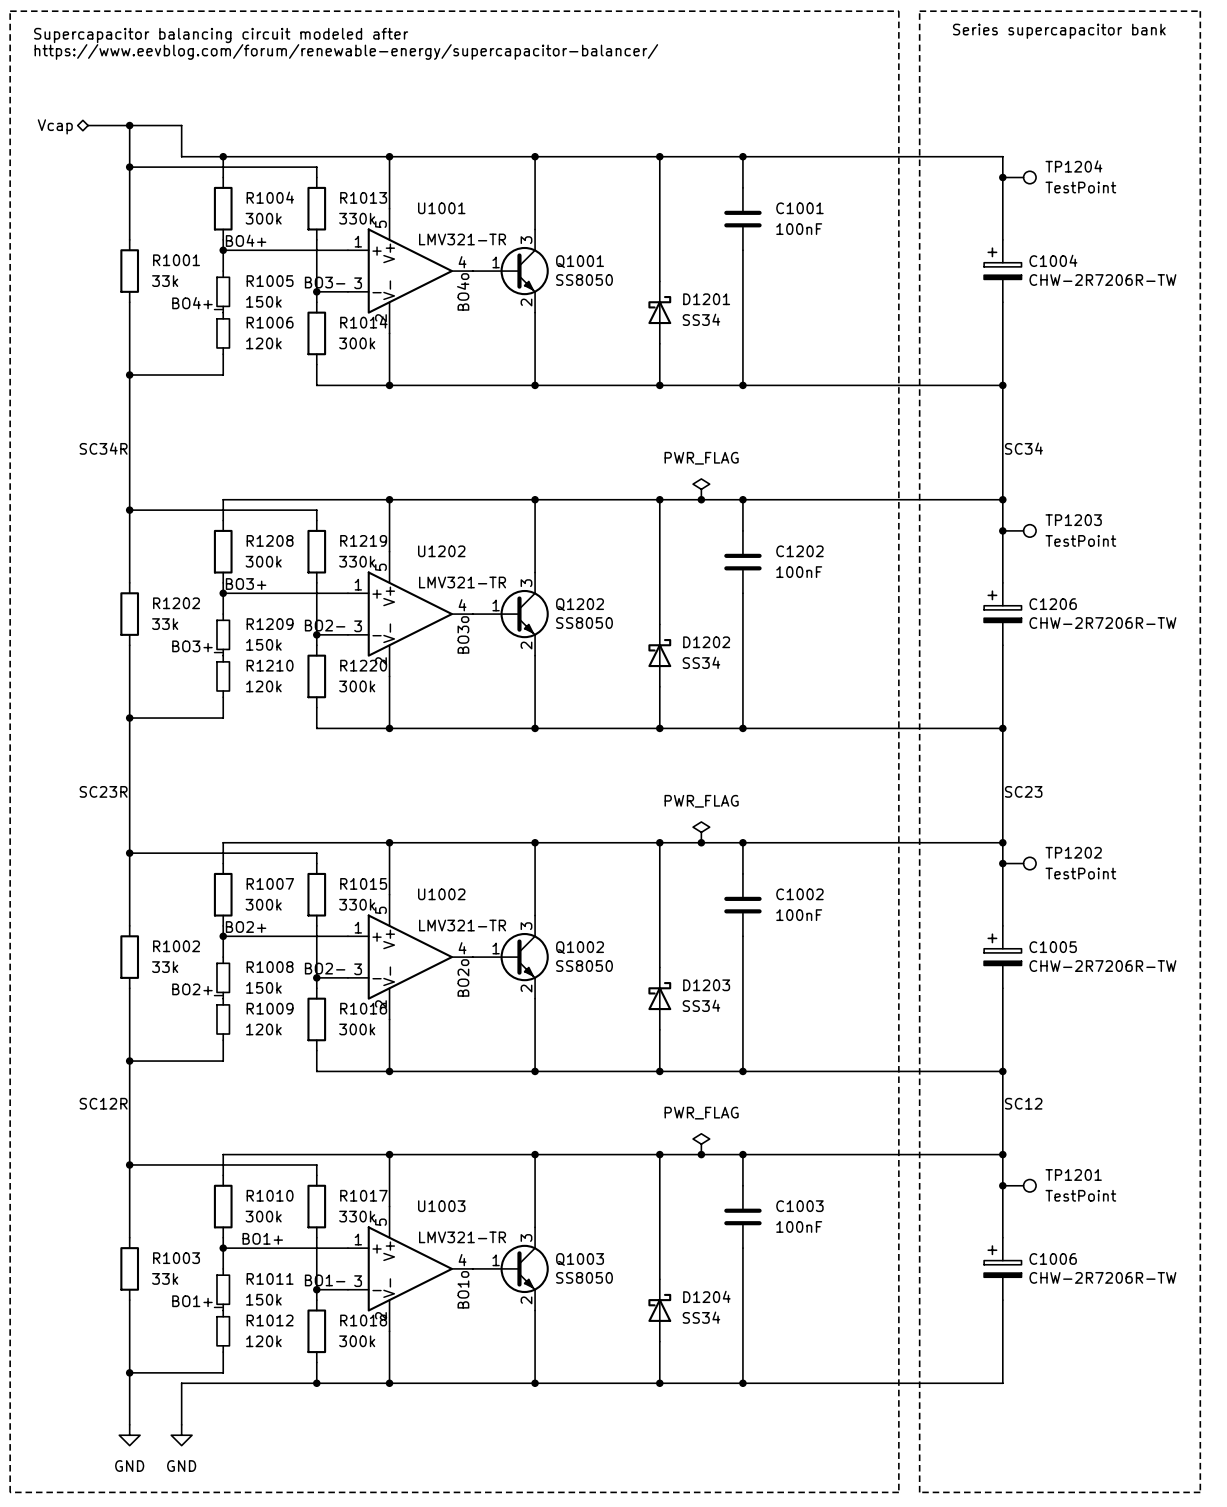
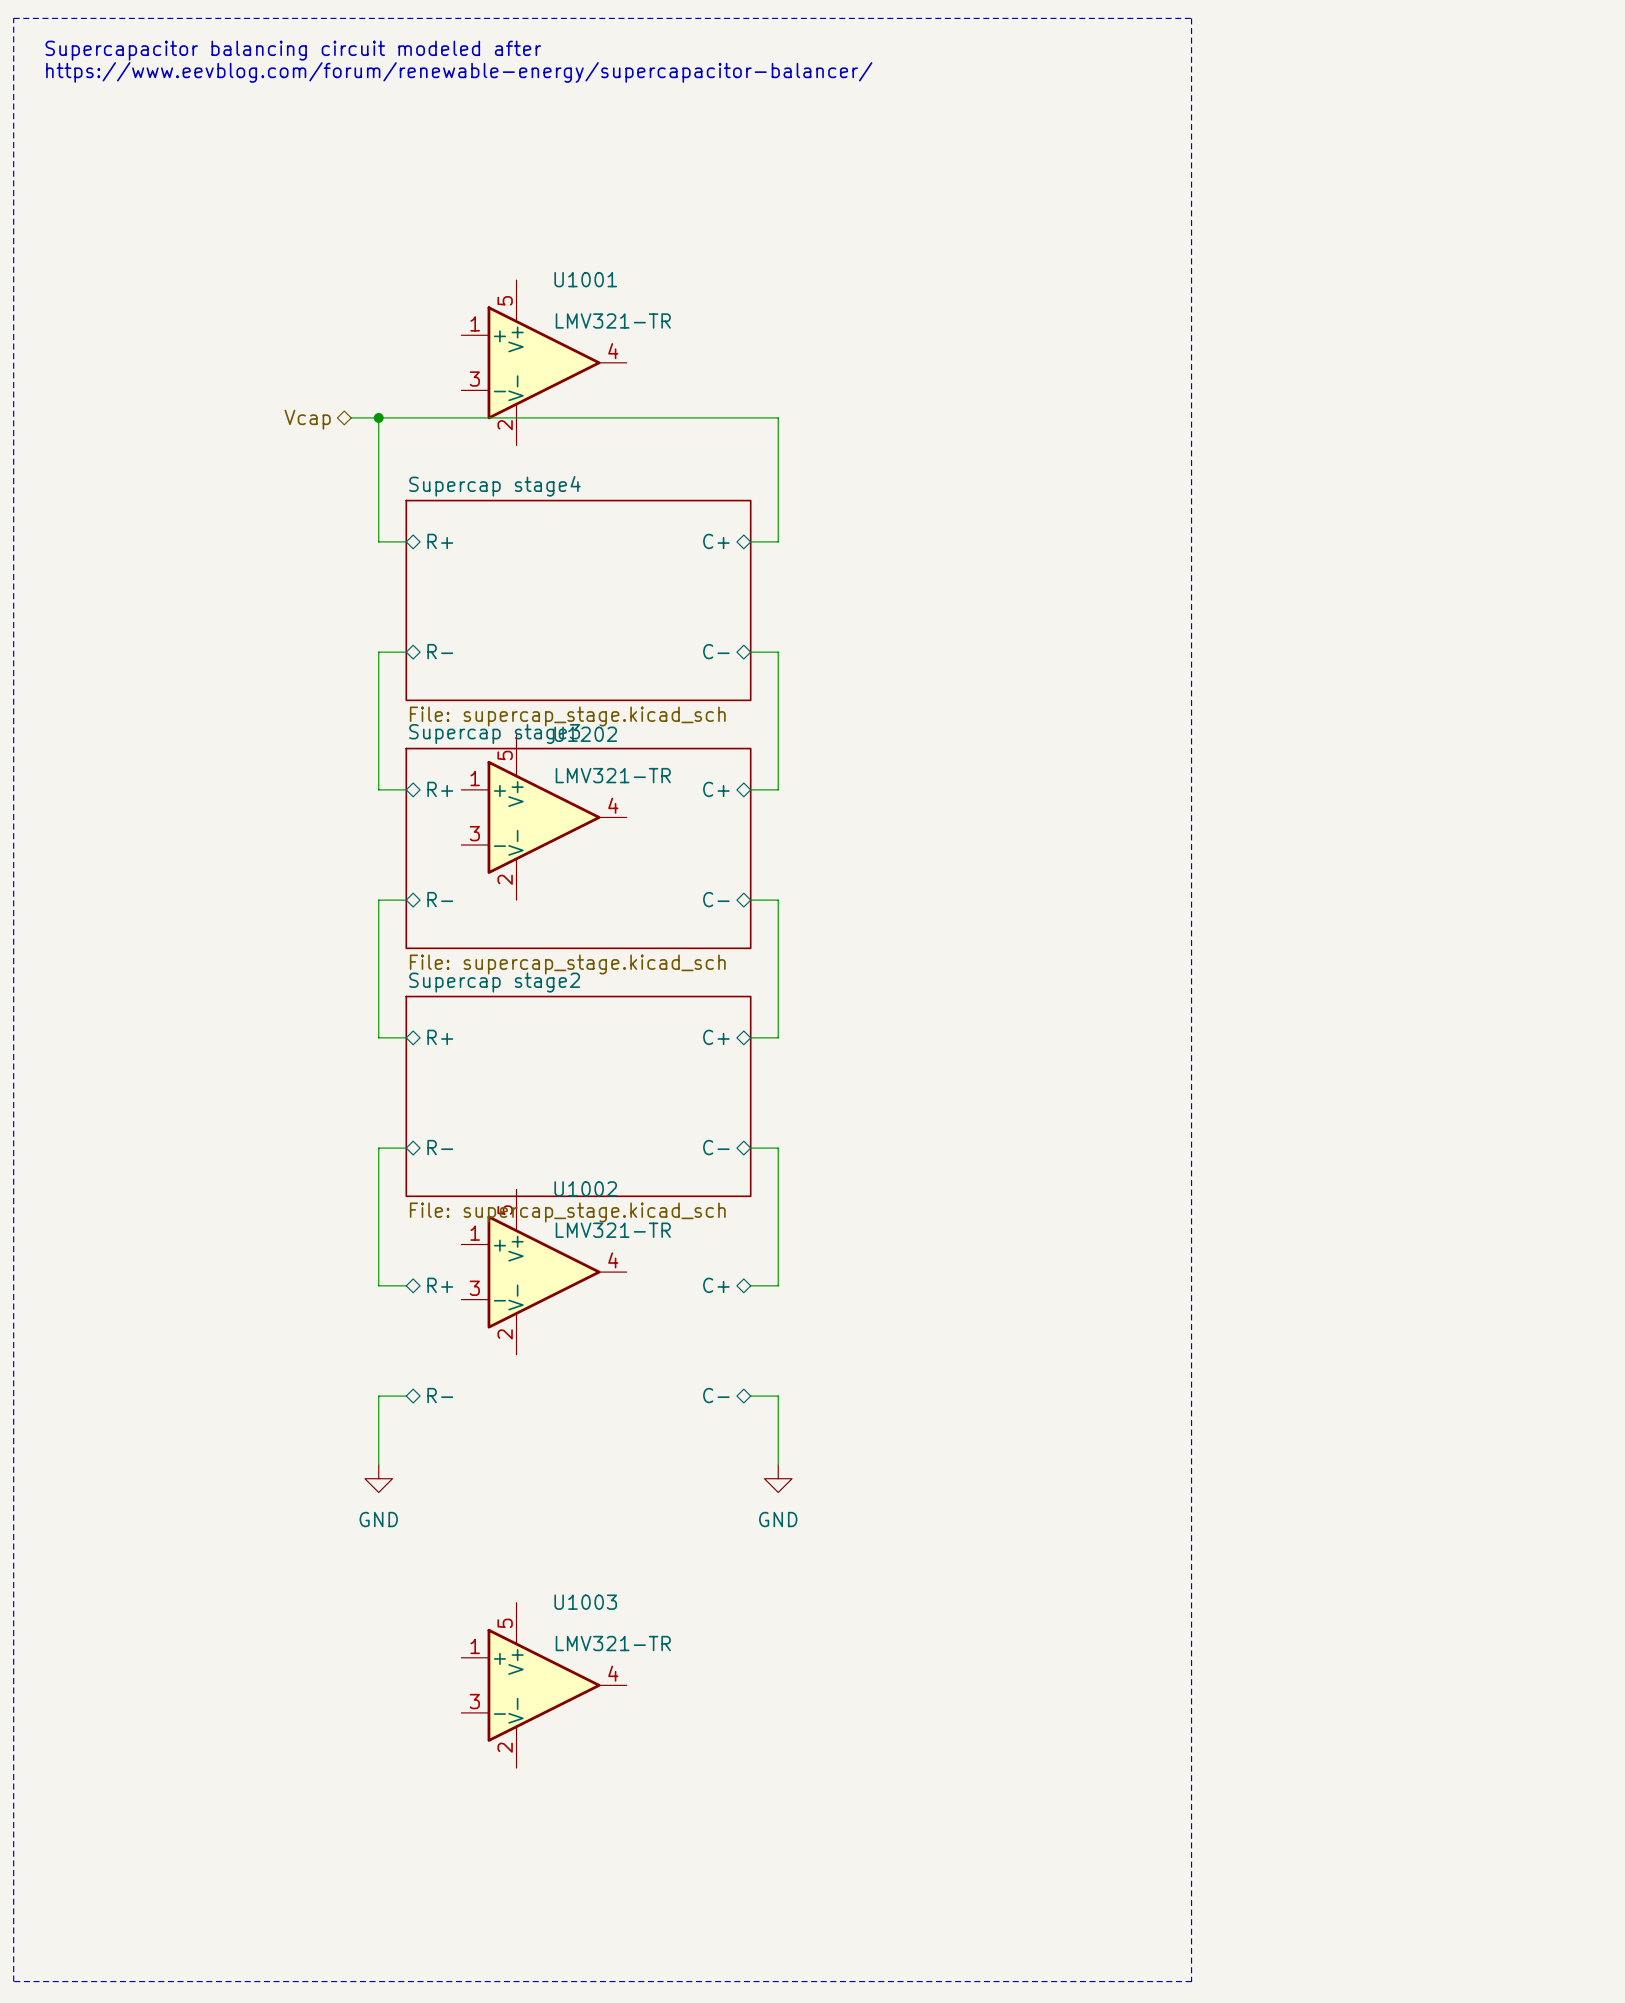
line: (919, 11) (1200, 11) (1200, 1492) (919, 1492) (919, 11) -> none
text: Series supercapacitor bank (1059, 31) -> none
wire: (88, 125) (181, 125) (181, 156) (1002, 156) (1002, 239) -> none
wire: (129, 125) (129, 239) -> none
junction: (129, 125) -> none
hierarchical label: Vcap (55, 126) -> none
wire: (223, 156) (223, 177) -> none
junction: (223, 156) -> none
wire: (389, 156) (389, 208) -> none
junction: (389, 156) -> none
wire: (535, 156) (535, 229) -> none
junction: (535, 156) -> none
wire: (659, 156) (659, 281) -> none
junction: (659, 156) -> none
wire: (742, 156) (742, 187) -> none
junction: (742, 156) -> none
wire: (129, 167) (316, 167) (316, 177) -> none
junction: (129, 167) -> none
junction: (1002, 177) -> none
TP1204: TestPoint (1019, 177) -> none
R1004: 300k (223, 208) -> none
R1013: 330k (316, 208) -> none
C1001: 100nF (742, 219) -> none
wire: (223, 239) (223, 271) -> none
wire: (316, 239) (316, 302) -> none
label: BO4+ (246, 240) -> none
wire: (223, 250) (347, 250) -> none
junction: (223, 250) -> none
wire: (742, 250) (742, 385) -> none
R1001: 33k (129, 271) -> none
Q1001: SS8050 (510, 271) -> none
C1004: CHW-2R7206R-TW (1002, 271) -> none
label: BO3- (325, 282) -> none
R1005: 150k (223, 291) -> none
wire: (316, 291) (347, 291) -> none
junction position: (316, 291) -> (378, 417)
label: BO4o (463, 291) -> none
wire: (129, 302) (129, 582) -> none
wire: (1002, 302) (1002, 582) -> none
label: BO4+_ (197, 303) -> none
wire: none -> (351, 417) (778, 417) (778, 541) (750, 541)
wire: none -> (378, 417) (378, 541) (406, 541)
wire: (535, 312) (535, 385) -> none
D1201: SS34 (659, 312) -> none
hierarchical label: none -> Vcap (307, 419)
R1006: 120k (223, 333) -> none
R1014: 300k (316, 333) -> none
wire: (389, 333) (389, 385) -> none
wire: (659, 343) (659, 385) -> none
wire: (223, 354) (223, 375) (129, 375) -> none
wire: (316, 364) (316, 385) (1002, 385) -> none
junction: (129, 375) -> none
junction: (389, 385) -> none
junction: (535, 385) -> none
junction: (659, 385) -> none
junction: (742, 385) -> none
junction: (1002, 385) -> none
sheet pin: none -> R+ (440, 541)
sheet pin: none -> C+ (716, 541)
label: SC34R (103, 448) -> none
label: SC34 (1023, 448) -> none
sheet Supercap stage4: none -> File: supercap_stage.kicad_sch (578, 600)
sheet pin: none -> R- (440, 651)
sheet pin: none -> C- (716, 651)
wire: none -> (750, 652) (778, 652) (778, 789) (750, 789)
power symbol: PWR_FLAG (701, 489) -> none
wire: (389, 499) (389, 551) -> none
junction: (389, 499) -> none
wire: (535, 499) (535, 572) -> none
junction: (535, 499) -> none
wire: (659, 499) (659, 624) -> none
junction: (659, 499) -> none
junction: (701, 499) -> none
wire: (742, 499) (742, 530) -> none
junction: (742, 499) -> none
wire: (1002, 499) (223, 499) (223, 520) -> none
junction: (1002, 499) -> none
wire: (129, 510) (316, 510) (316, 520) -> none
junction: (129, 510) -> none
junction: (1002, 530) -> none
TP1203: TestPoint (1019, 530) -> none
R1208: 300k (223, 551) -> none
R1219: 330k (316, 551) -> none
C1202: 100nF (742, 562) -> none
wire: (223, 582) (223, 614) -> none
wire: (316, 582) (316, 645) -> none
label: BO3+ (246, 584) -> none
sheet pin: none -> R+ (440, 789)
sheet pin: none -> C+ (716, 789)
wire: (223, 593) (285, 593) -> (406, 652) (378, 652) (378, 789)
junction: (223, 593) -> none
wire: (306, 593) (347, 593) -> none
wire: (742, 593) (742, 728) -> none
R1202: 33k (129, 614) -> none
Q1202: SS8050 (510, 614) -> none
C1206: CHW-2R7206R-TW (1002, 614) -> none
label: BO2- (325, 625) -> none
R1209: 150k (223, 634) -> none
wire: (316, 634) (347, 634) -> none
junction: (316, 634) -> none
label: BO3o (463, 634) -> none
sheet Supercap stage3: none -> File: supercap_stage.kicad_sch (578, 848)
wire: (129, 645) (129, 925) -> none
wire: (1002, 645) (1002, 925) -> none
label: BO3+_ (197, 646) -> none
wire: (535, 655) (535, 728) -> none
D1202: SS34 (659, 655) -> none
R1210: 120k (223, 676) -> none
wire: none -> (406, 900) (378, 900) (378, 1037) (406, 1037)
R1220: 300k (316, 676) -> none
sheet pin: none -> R- (440, 899)
wire: (389, 676) (389, 728) -> none
sheet pin: none -> C- (716, 899)
wire: none -> (750, 900) (778, 900) (778, 1037) (750, 1037)
wire: (659, 686) (659, 728) -> none
wire: (223, 697) (223, 718) (129, 718) -> none
wire: (316, 707) (316, 728) (1002, 728) -> none
junction: (129, 718) -> none
junction: (389, 728) -> none
junction: (535, 728) -> none
junction: (659, 728) -> none
junction: (742, 728) -> none
junction: (1002, 728) -> none
sheet pin: none -> R+ (440, 1037)
sheet pin: none -> C+ (716, 1037)
label: SC23R (103, 791) -> none
label: SC23 (1023, 791) -> none
sheet Supercap stage2: none -> File: supercap_stage.kicad_sch (578, 1096)
power symbol: PWR_FLAG (701, 832) -> none
wire: (389, 842) (389, 894) -> none
junction: (389, 842) -> none
wire: (535, 842) (535, 915) -> none
junction: (535, 842) -> none
wire: (659, 842) (659, 967) -> none
junction: (659, 842) -> none
junction: (701, 842) -> none
wire: (742, 842) (742, 873) -> none
junction: (742, 842) -> none
wire: (1002, 842) (223, 842) (223, 863) -> none
junction: (1002, 842) -> none
wire: (129, 853) (316, 853) (316, 863) -> none
junction: (129, 853) -> none
wire: none -> (406, 1148) (378, 1148) (378, 1285) (406, 1285)
sheet pin: none -> R- (440, 1147)
sheet pin: none -> C- (716, 1147)
wire: none -> (750, 1148) (778, 1148) (778, 1285) (750, 1285)
junction: (1002, 863) -> none
TP1202: TestPoint (1019, 863) -> none
R1007: 300k (223, 894) -> none
R1015: 330k (316, 894) -> none
C1002: 100nF (742, 905) -> none
wire: (223, 925) (223, 957) -> none
wire: (316, 925) (316, 988) -> none
label: BO2+ (246, 927) -> none
wire: (223, 936) (347, 936) -> none
junction: (223, 936) -> none
wire: (742, 936) (742, 1071) -> none
R1002: 33k (129, 957) -> none
Q1002: SS8050 (510, 957) -> none
C1005: CHW-2R7206R-TW (1002, 957) -> none
sheet pin: none -> R+ (440, 1285)
sheet pin: none -> C+ (716, 1285)
label: BO2- (325, 968) -> none
R1008: 150k (223, 977) -> none
wire: (316, 977) (347, 977) -> none
junction: (316, 977) -> none
label: BO2o (463, 977) -> none
wire: (129, 988) (129, 1237) -> none
wire: (1002, 988) (1002, 1237) -> none
label: BO2+_ (197, 989) -> none
wire: (535, 998) (535, 1071) -> none
D1203: SS34 (659, 998) -> none
R1009: 120k (223, 1019) -> none
R1016: 300k (316, 1019) -> none
wire: (389, 1019) (389, 1071) -> none
wire: (659, 1029) (659, 1071) -> none
wire: (223, 1040) (223, 1061) (129, 1061) -> none
wire: none -> (406, 1396) (378, 1396) (378, 1464)
wire: (316, 1050) (316, 1071) (1002, 1071) -> none
sheet pin: none -> R- (440, 1395)
sheet pin: none -> C- (716, 1395)
wire: none -> (750, 1396) (778, 1396) (778, 1464)
junction: (129, 1061) -> none
junction: (389, 1071) -> none
junction: (535, 1071) -> none
junction: (659, 1071) -> none
junction: (742, 1071) -> none
junction: (1002, 1071) -> none
label: SC12R (103, 1103) -> none
label: SC12 (1023, 1103) -> none
power symbol: none -> GND (378, 1478)
power symbol: none -> GND (778, 1478)
power symbol: PWR_FLAG (701, 1144) -> none
wire: (389, 1154) (389, 1206) -> none
junction: (389, 1154) -> none
wire: (535, 1154) (535, 1227) -> none
junction: (535, 1154) -> none
wire: (659, 1154) (659, 1279) -> none
junction: (659, 1154) -> none
junction: (701, 1154) -> none
wire: (742, 1154) (742, 1185) -> none
junction: (742, 1154) -> none
wire: (1002, 1154) (223, 1154) (223, 1175) -> none
junction: (1002, 1154) -> none
wire: (129, 1164) (316, 1164) (316, 1175) -> none
junction: (129, 1164) -> none
junction: (1002, 1185) -> none
TP1201: TestPoint (1019, 1185) -> none
R1010: 300k (223, 1206) -> none
R1017: 330k (316, 1206) -> none
C1003: 100nF (742, 1216) -> none
wire: (223, 1237) (223, 1268) -> none
wire: (316, 1237) (316, 1300) -> none
label: BO1+ (262, 1238) -> none
wire: (223, 1248) (347, 1248) -> none
junction: (223, 1248) -> none
wire: (742, 1248) (742, 1383) -> none
R1003: 33k (129, 1268) -> none
Q1003: SS8050 (510, 1268) -> none
C1006: CHW-2R7206R-TW (1002, 1268) -> none
label: BO1- (325, 1280) -> none
R1011: 150k (223, 1289) -> none
wire: (316, 1289) (347, 1289) -> none
junction: (316, 1289) -> none
label: BO1o (463, 1289) -> none
wire: (129, 1300) (129, 1424) -> none
wire: (1002, 1300) (1002, 1383) (181, 1383) (181, 1424) -> none
label: BO1+_ (197, 1301) -> none
wire: (535, 1310) (535, 1383) -> none
D1204: SS34 (659, 1310) -> none
R1012: 120k (223, 1331) -> none
R1018: 300k (316, 1331) -> none
wire: (389, 1331) (389, 1383) -> none
wire: (659, 1341) (659, 1383) -> none
wire: (223, 1352) (223, 1372) (129, 1372) -> none
wire: (316, 1362) (316, 1383) -> none
junction: (129, 1372) -> none
junction: (316, 1383) -> none
junction: (389, 1383) -> none
junction: (535, 1383) -> none
junction: (659, 1383) -> none
junction: (742, 1383) -> none
power symbol: GND (129, 1435) -> none
power symbol: GND (181, 1435) -> none

